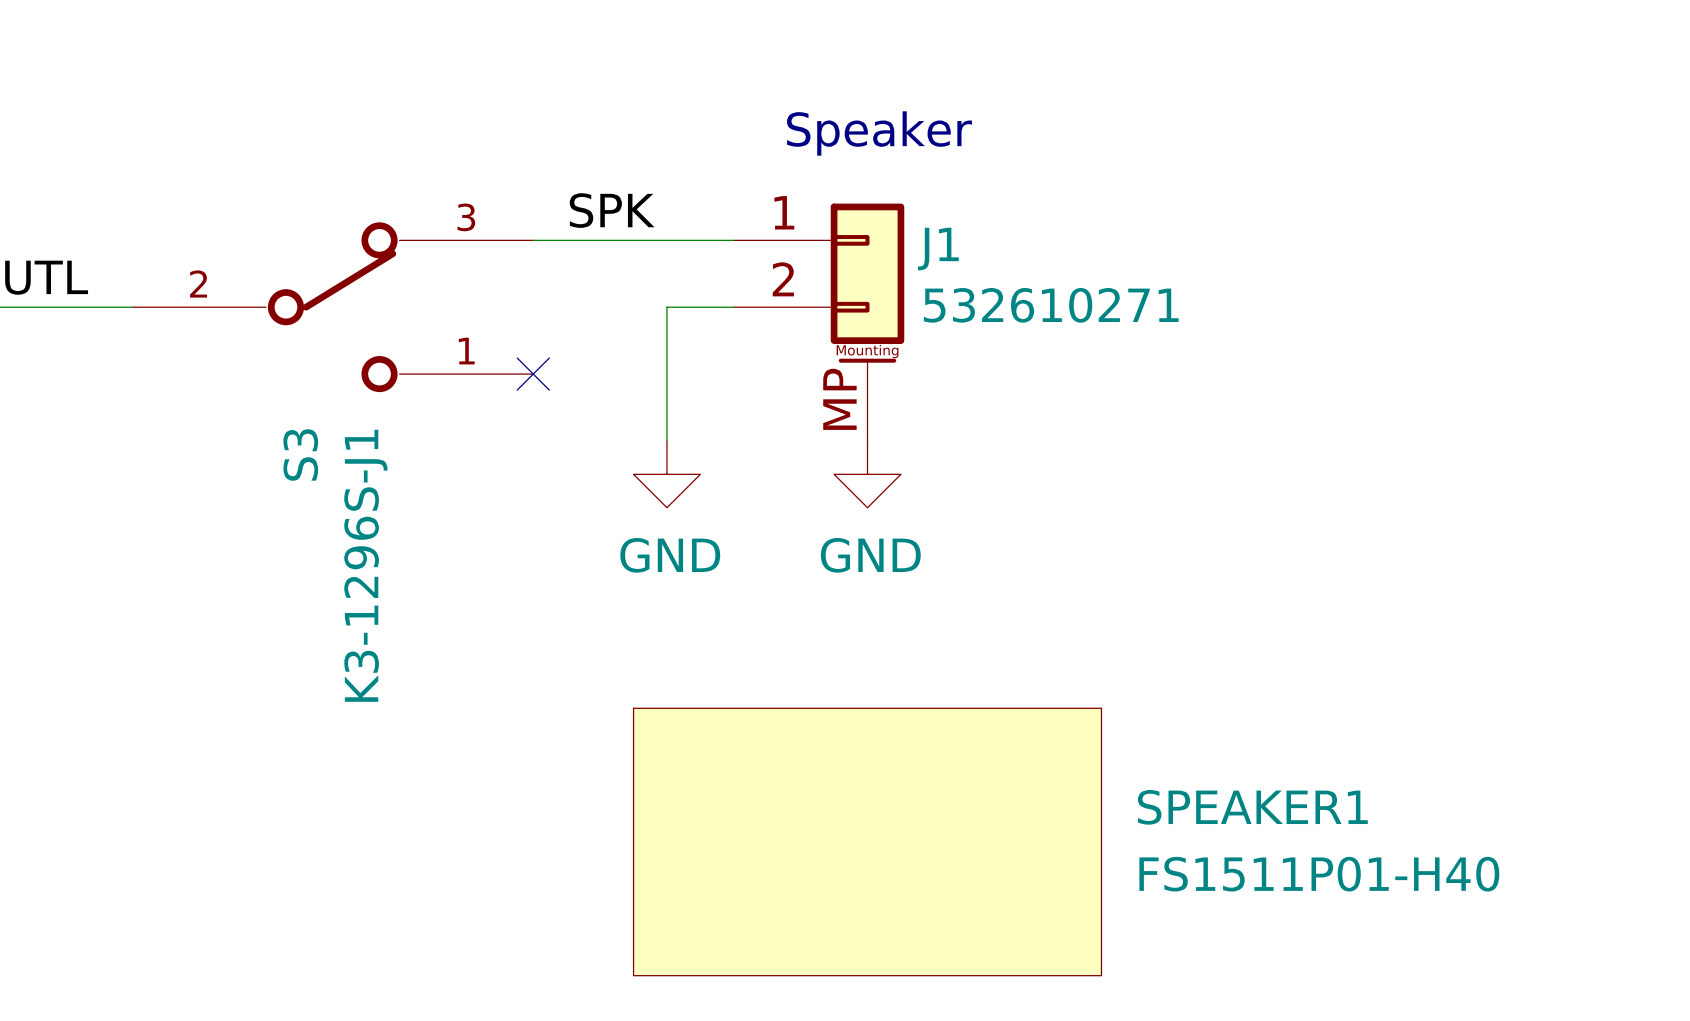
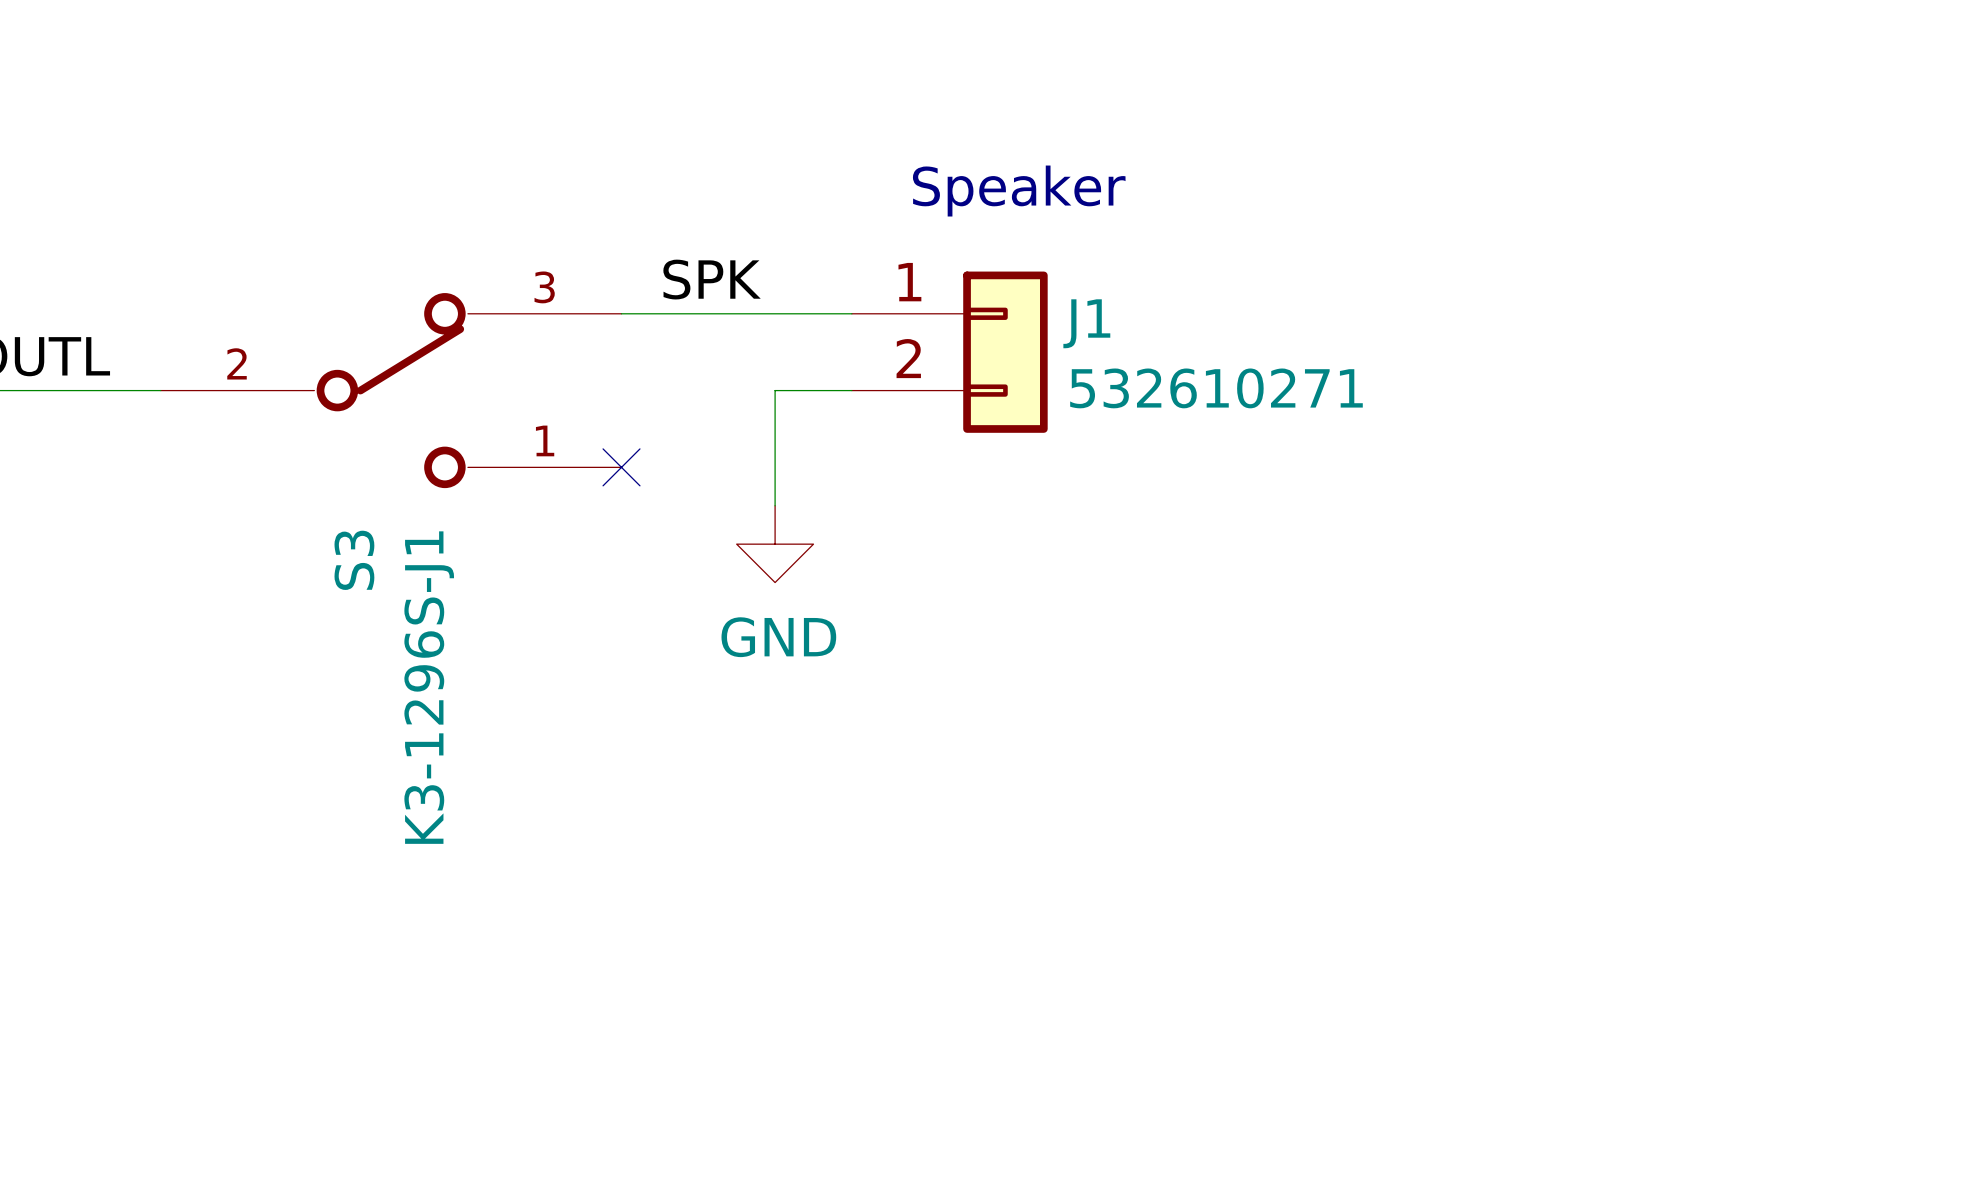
J1 symbol: [733, 203, 905, 441] -> [851, 271, 1048, 433]
power symbol position: GND (666, 474) -> GND (775, 544)
power symbol: GND (867, 474) -> none
SPEAKER1: FS1511P01-H40 (867, 841) -> none

